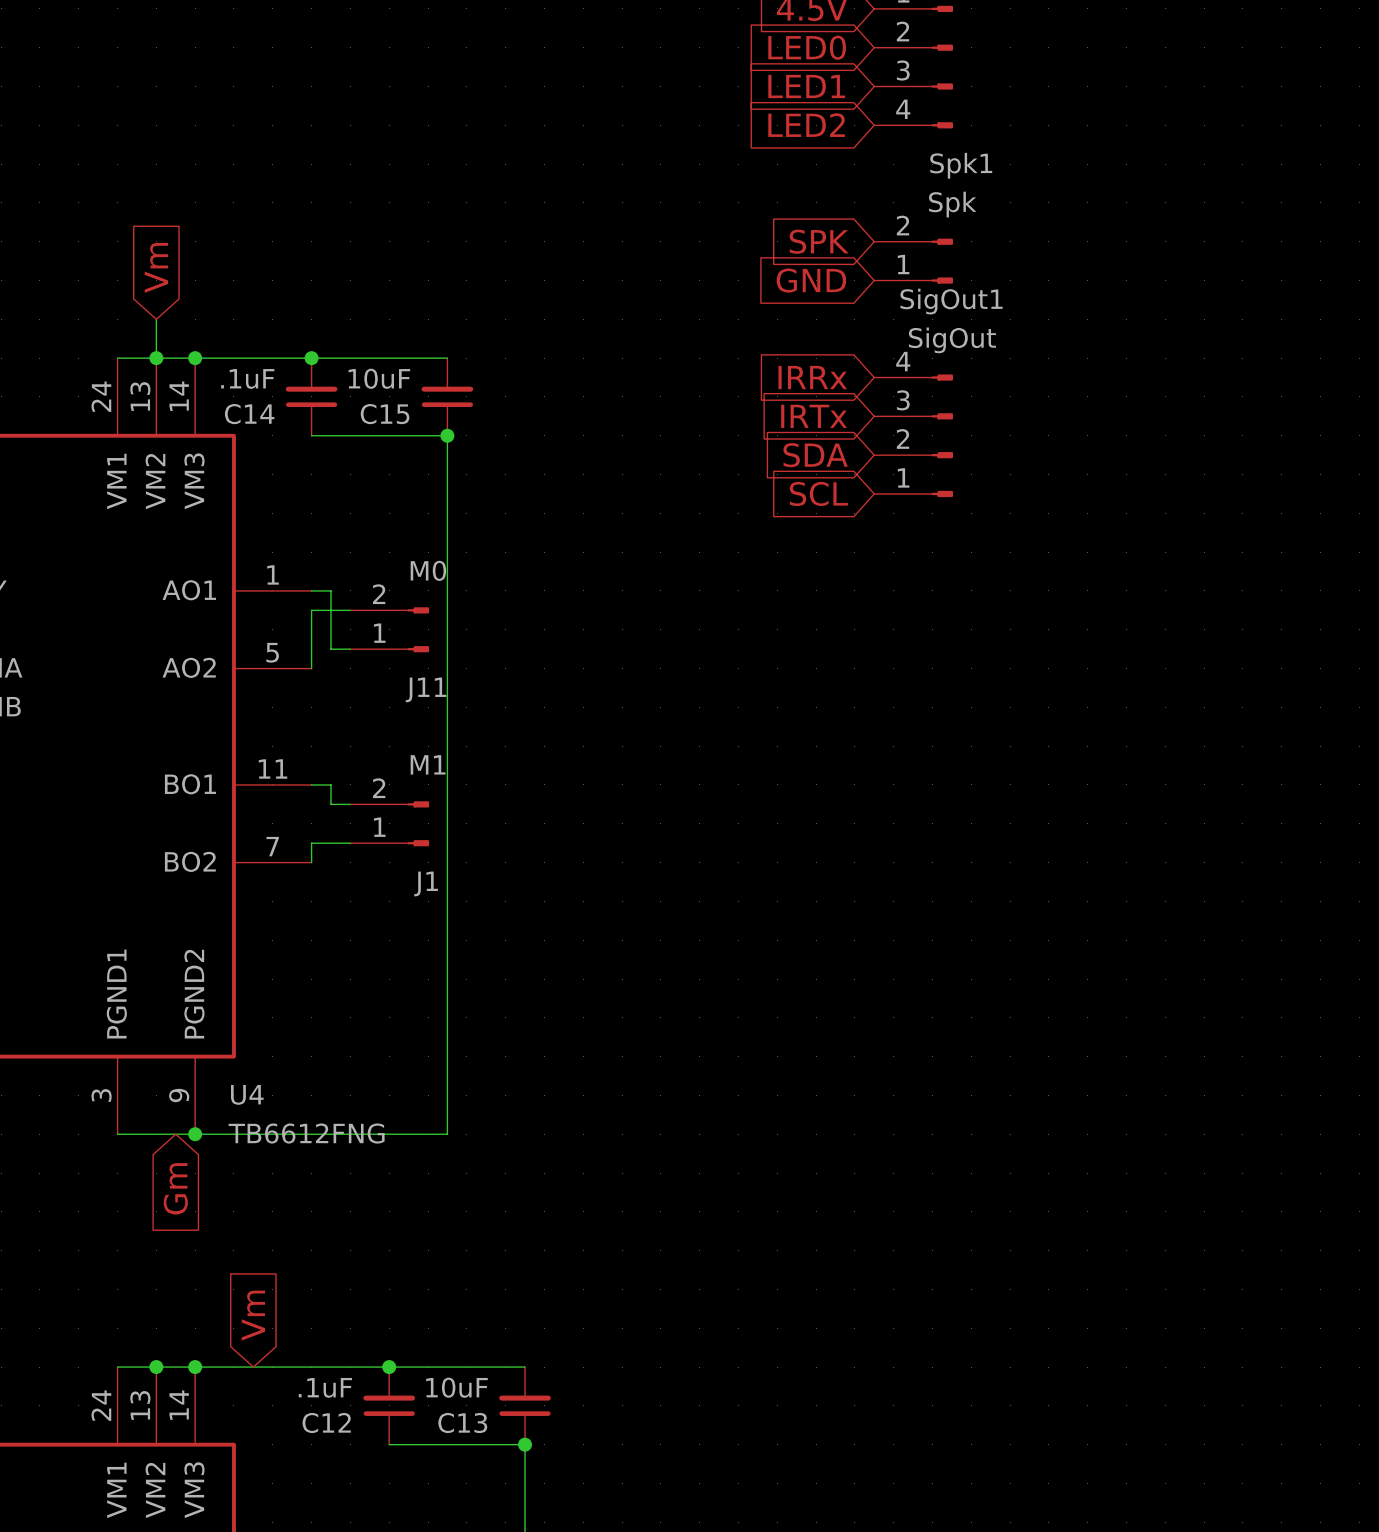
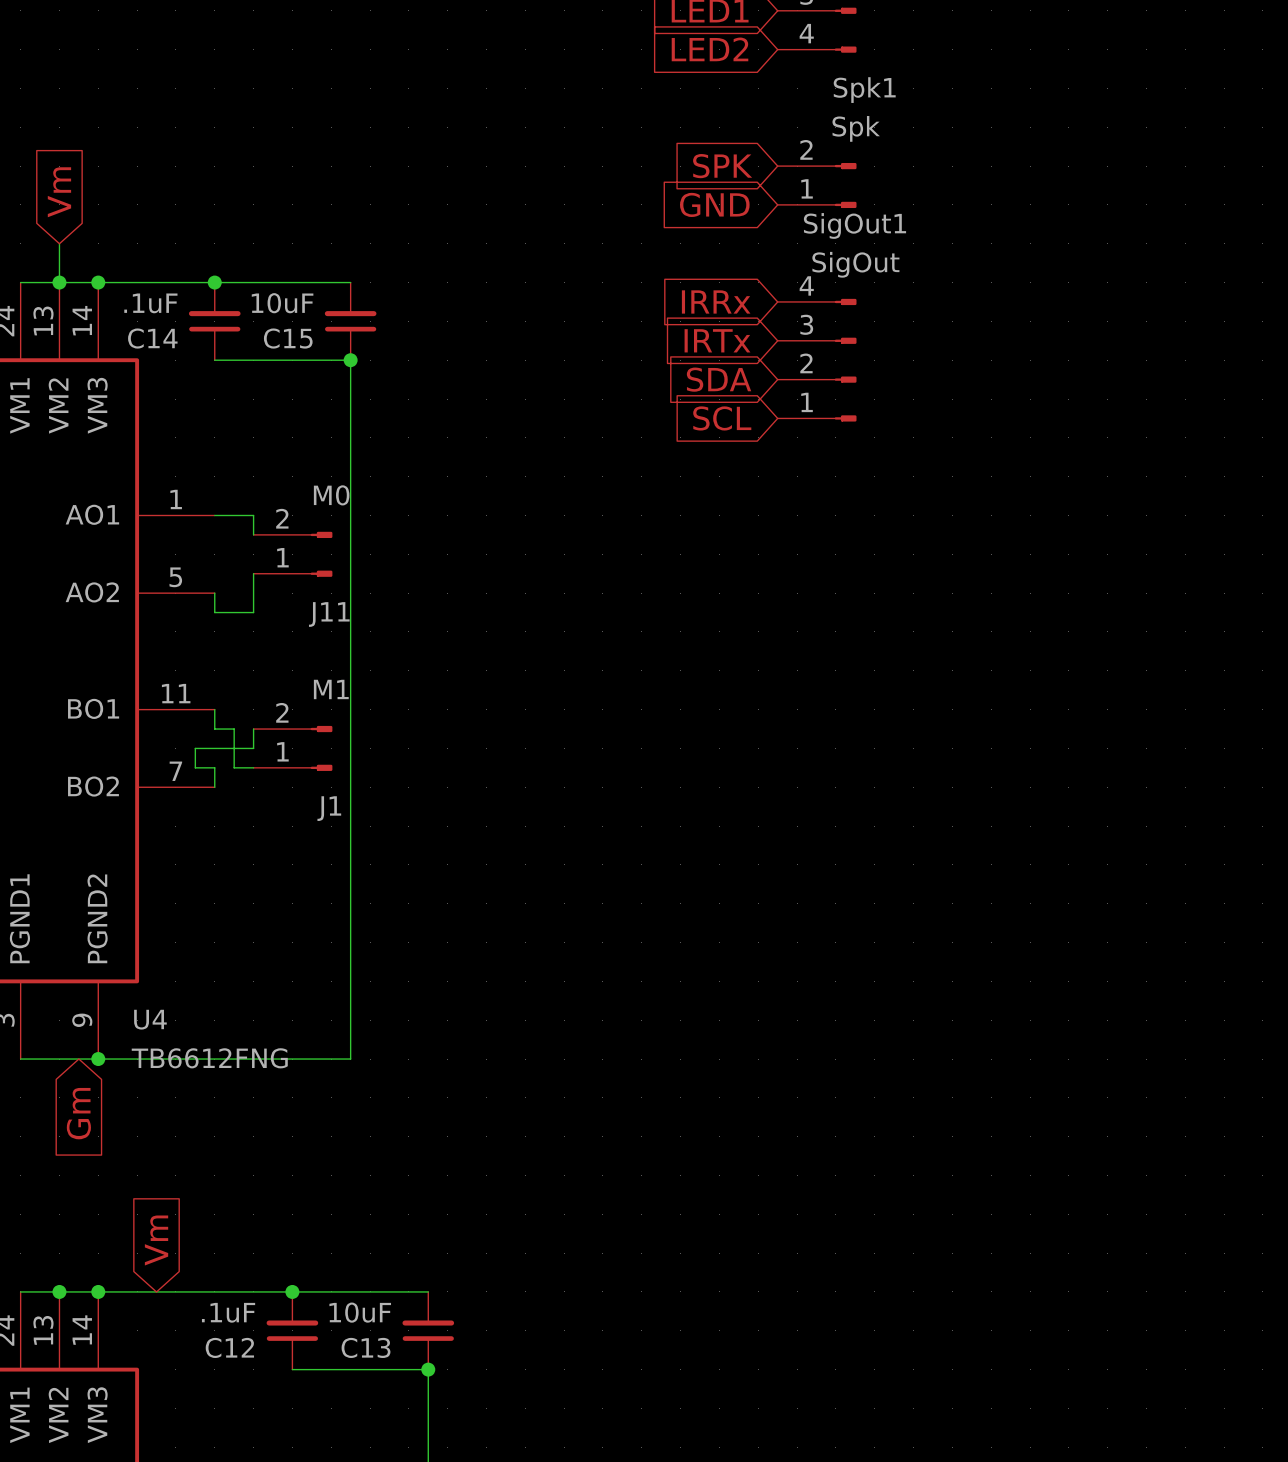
wire: (330, 590) (330, 649) (350, 649) -> (234, 515) (253, 515) (253, 534)
wire: (350, 610) (311, 610) (311, 668) -> (253, 573) (253, 612) (214, 612) (214, 593)
wire: (311, 784) (330, 784) (330, 804) (350, 804) -> (214, 709) (214, 729) (234, 729) (234, 767)
wire: (311, 843) (330, 843) -> (214, 767) (195, 767) (195, 748) (253, 748) (253, 729)

